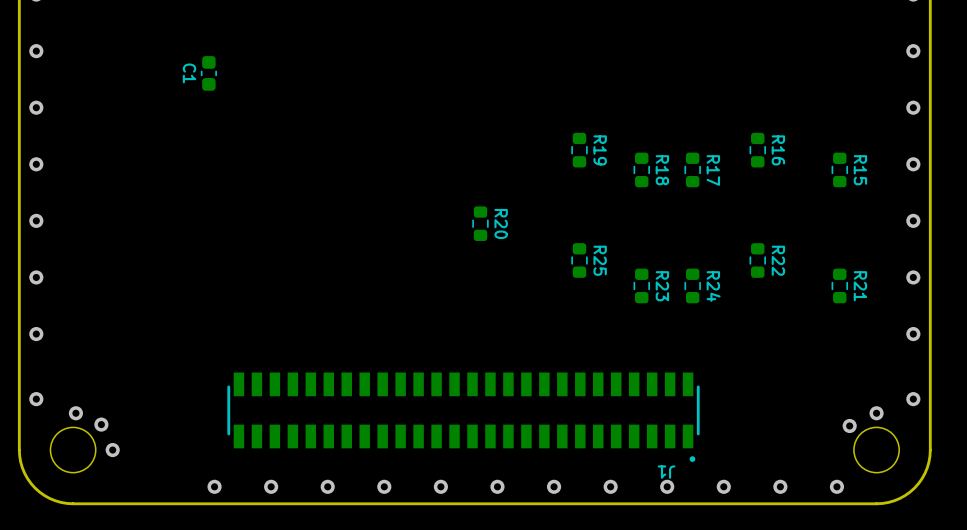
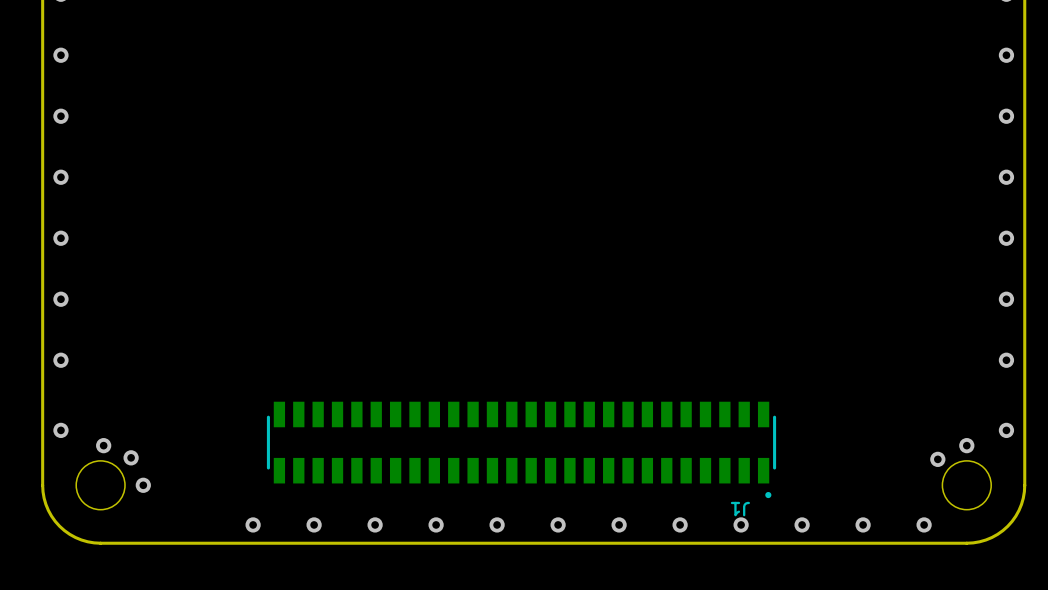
C1: (208, 73) -> none
R19: (579, 150) -> none
R16: (757, 150) -> none
R18: (641, 169) -> none
R17: (692, 169) -> none
R15: (839, 169) -> none
R20: (480, 223) -> none
R25: (579, 260) -> none
R22: (757, 260) -> none
R23: (641, 285) -> none
R24: (692, 285) -> none
R21: (839, 285) -> none

